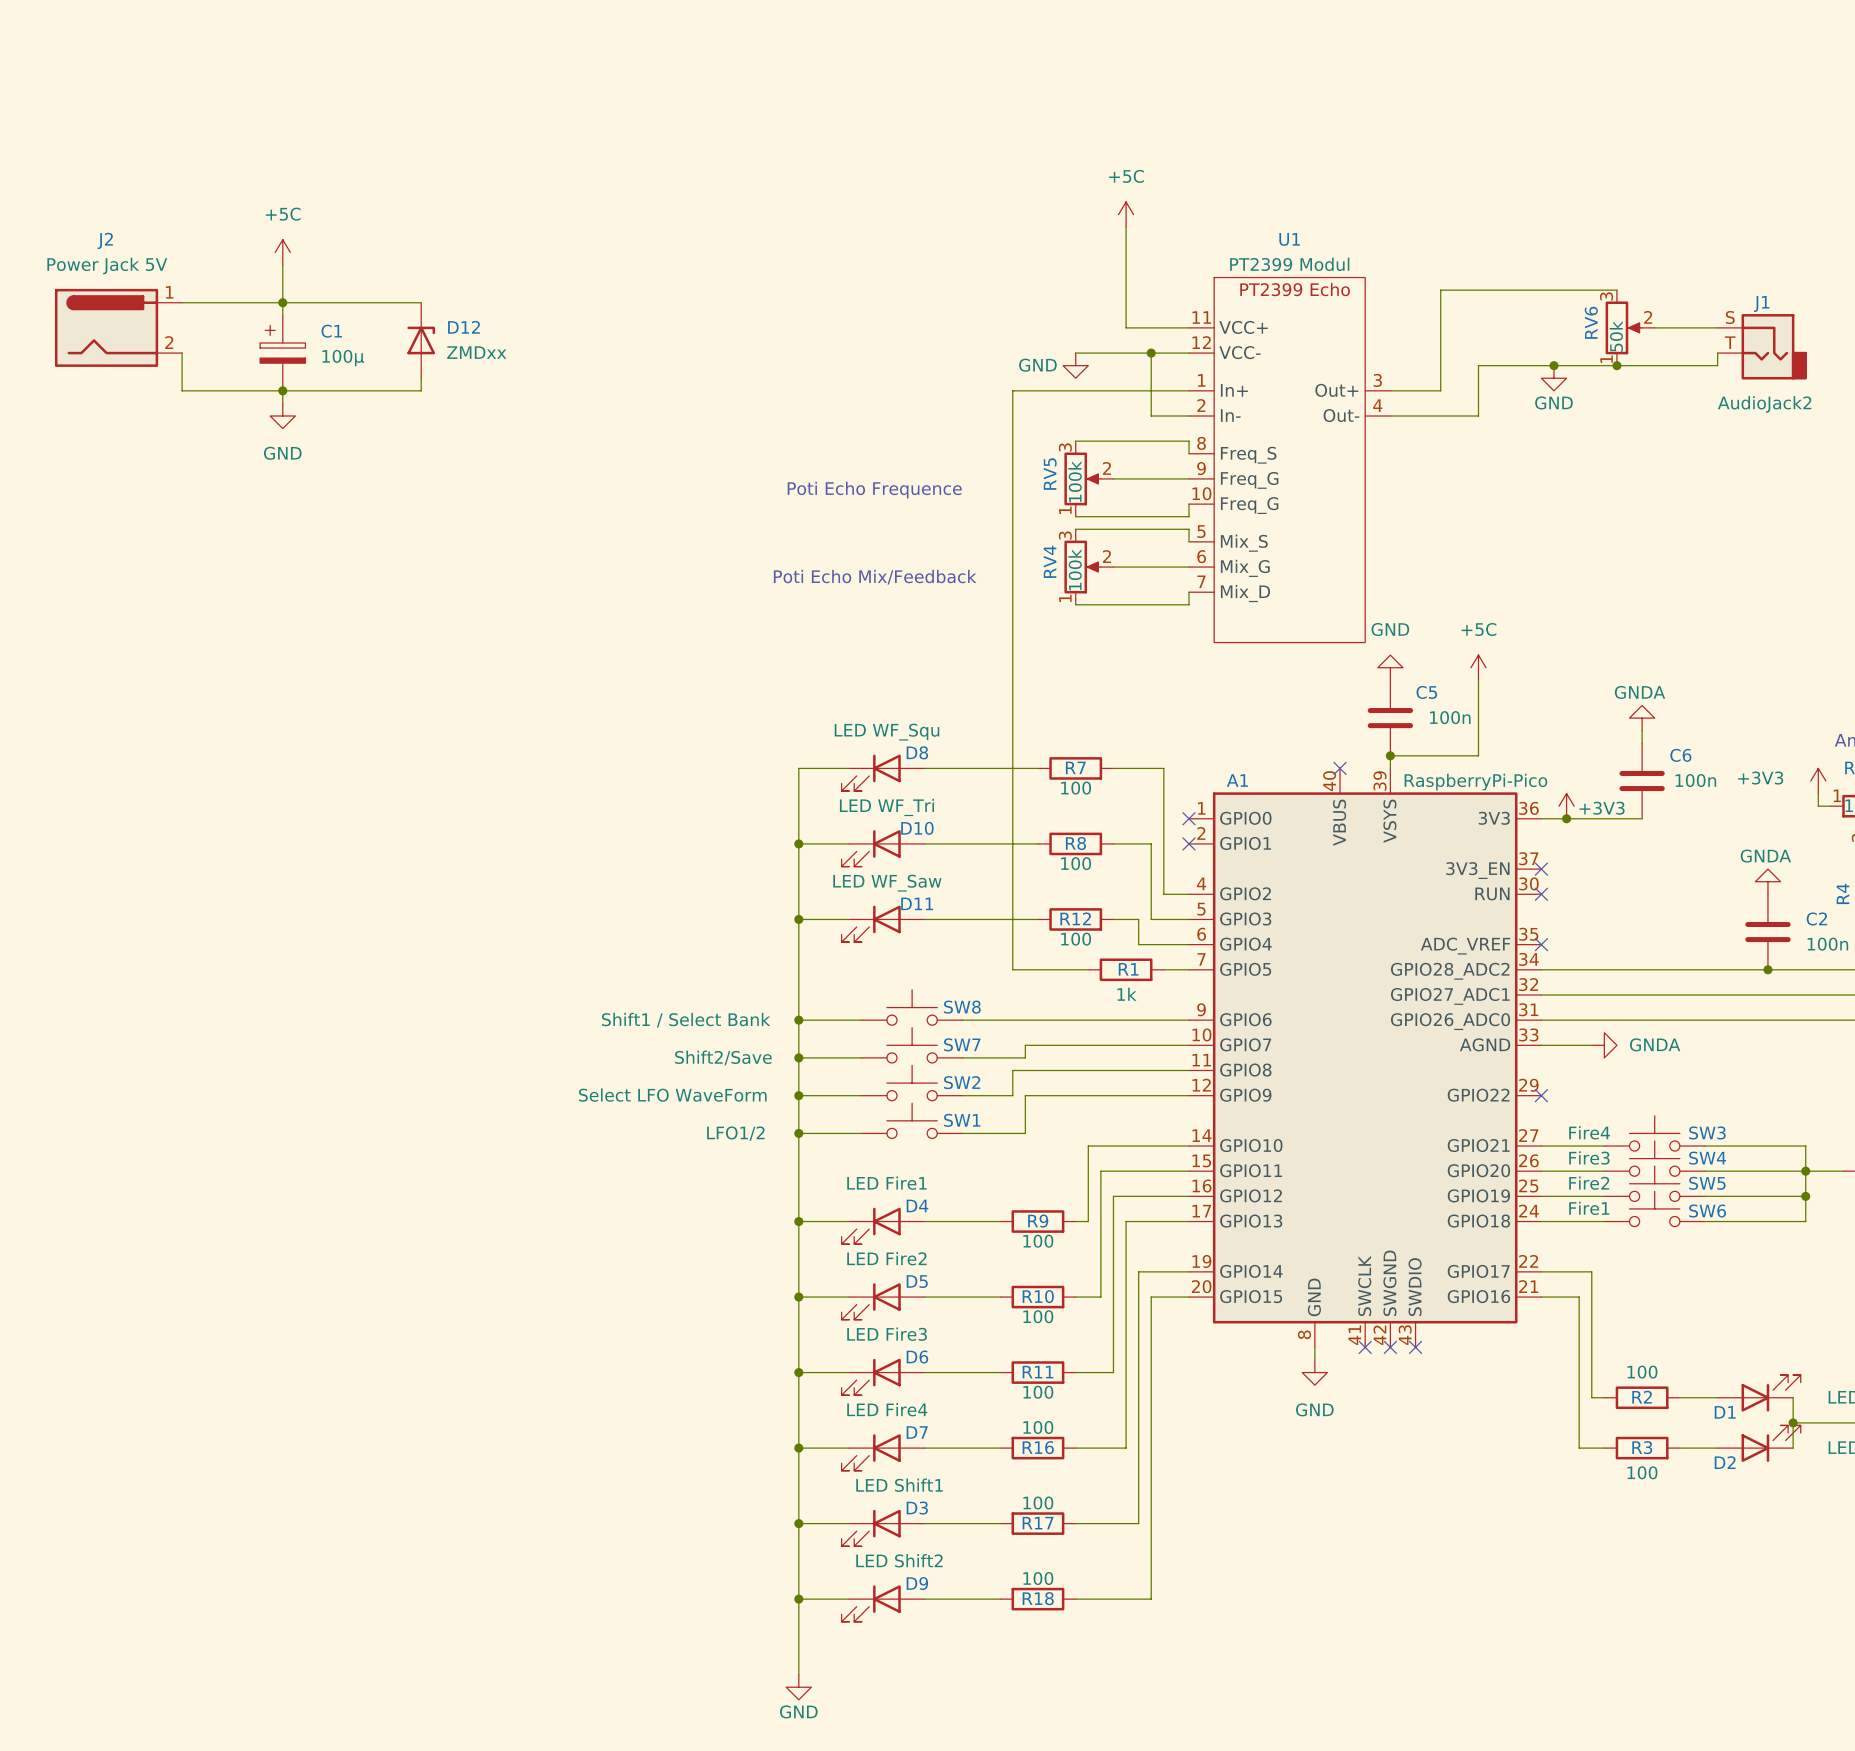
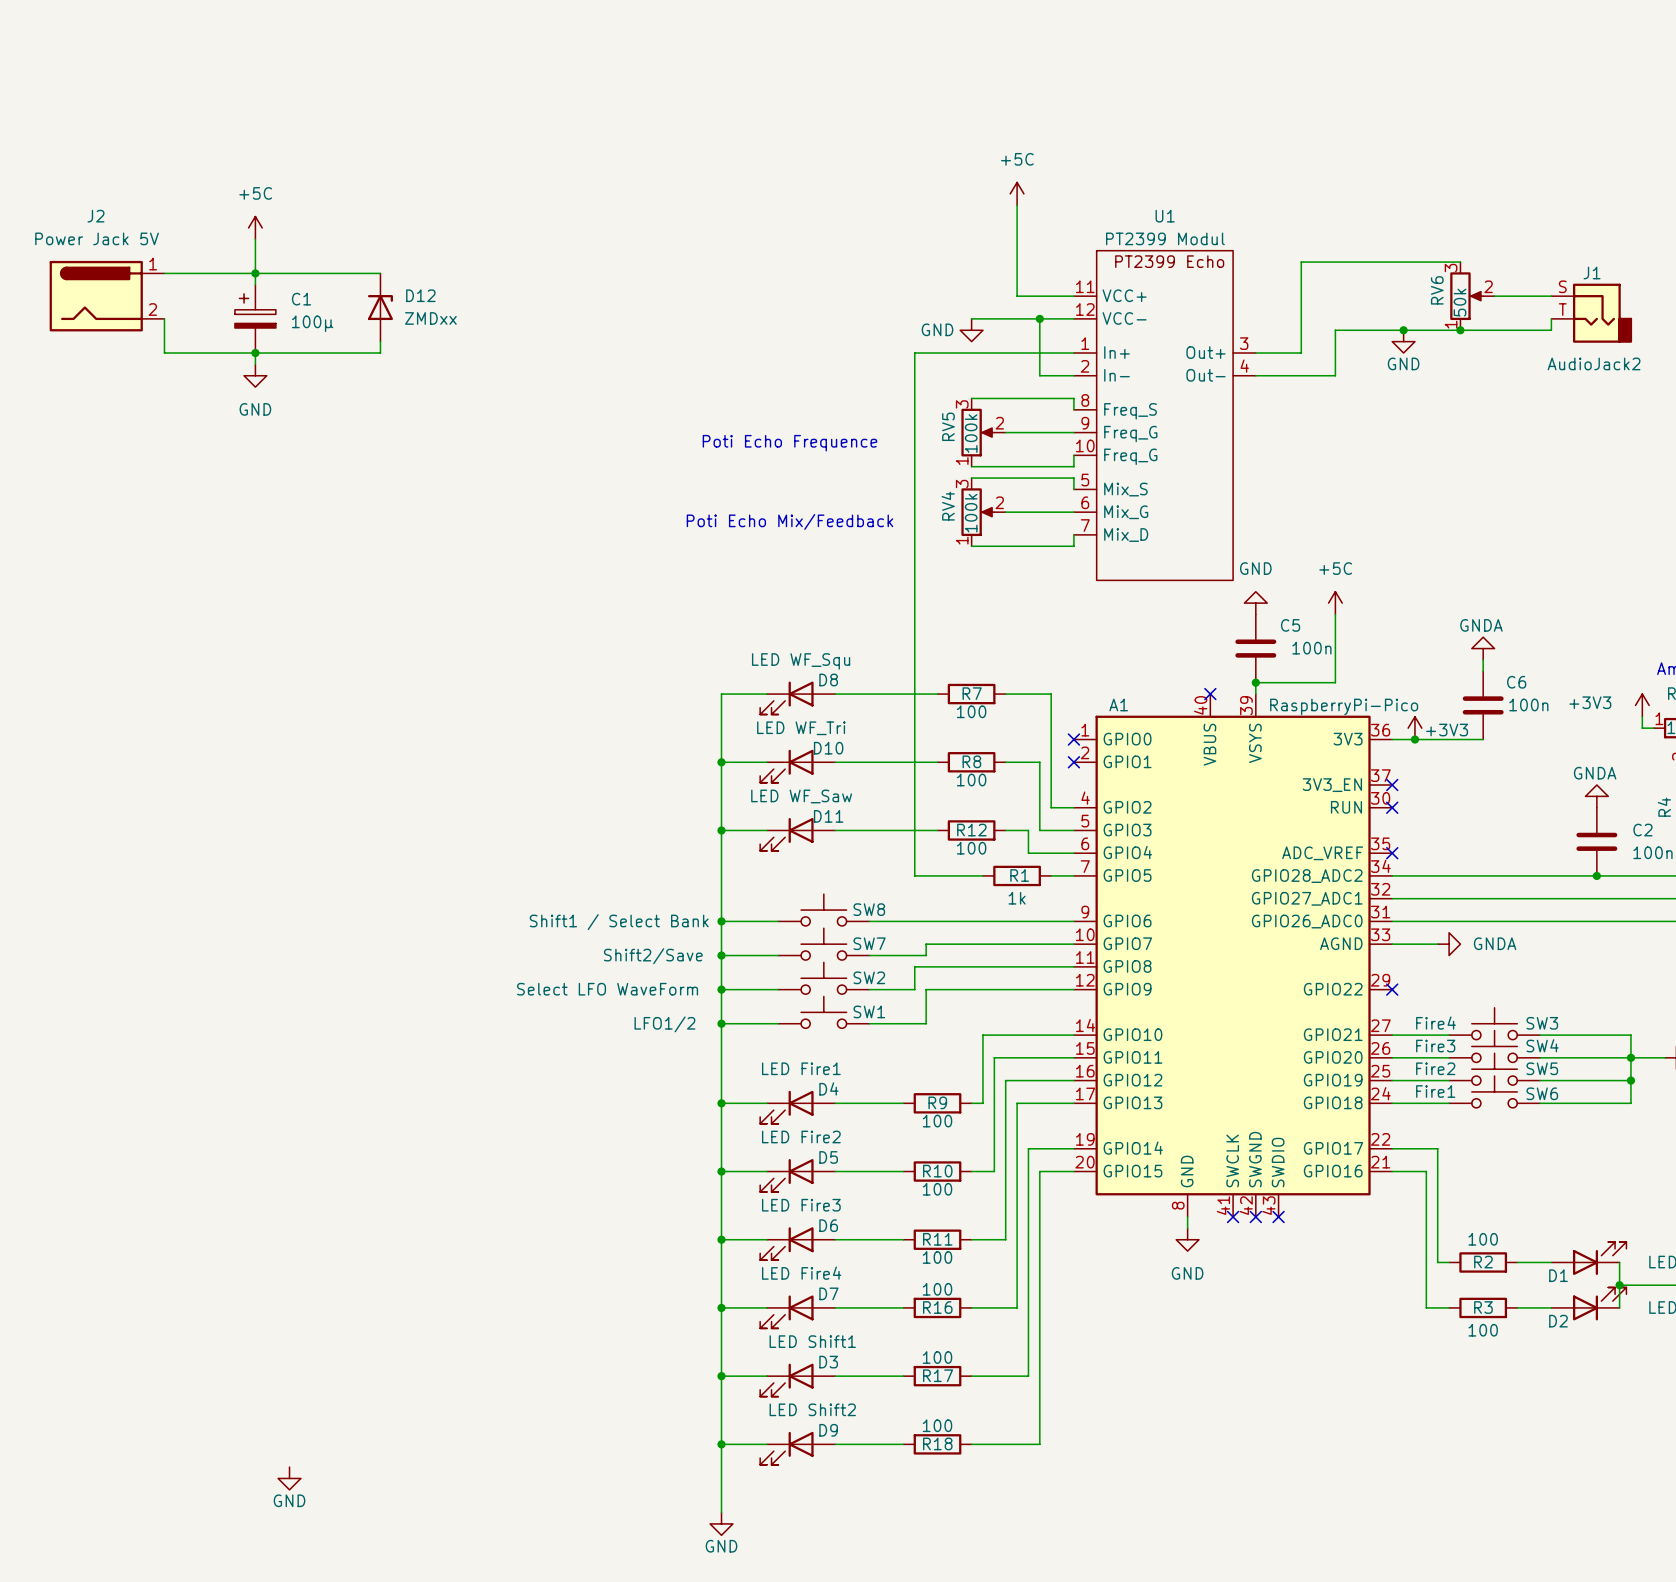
power symbol: none -> GND (289, 1478)

